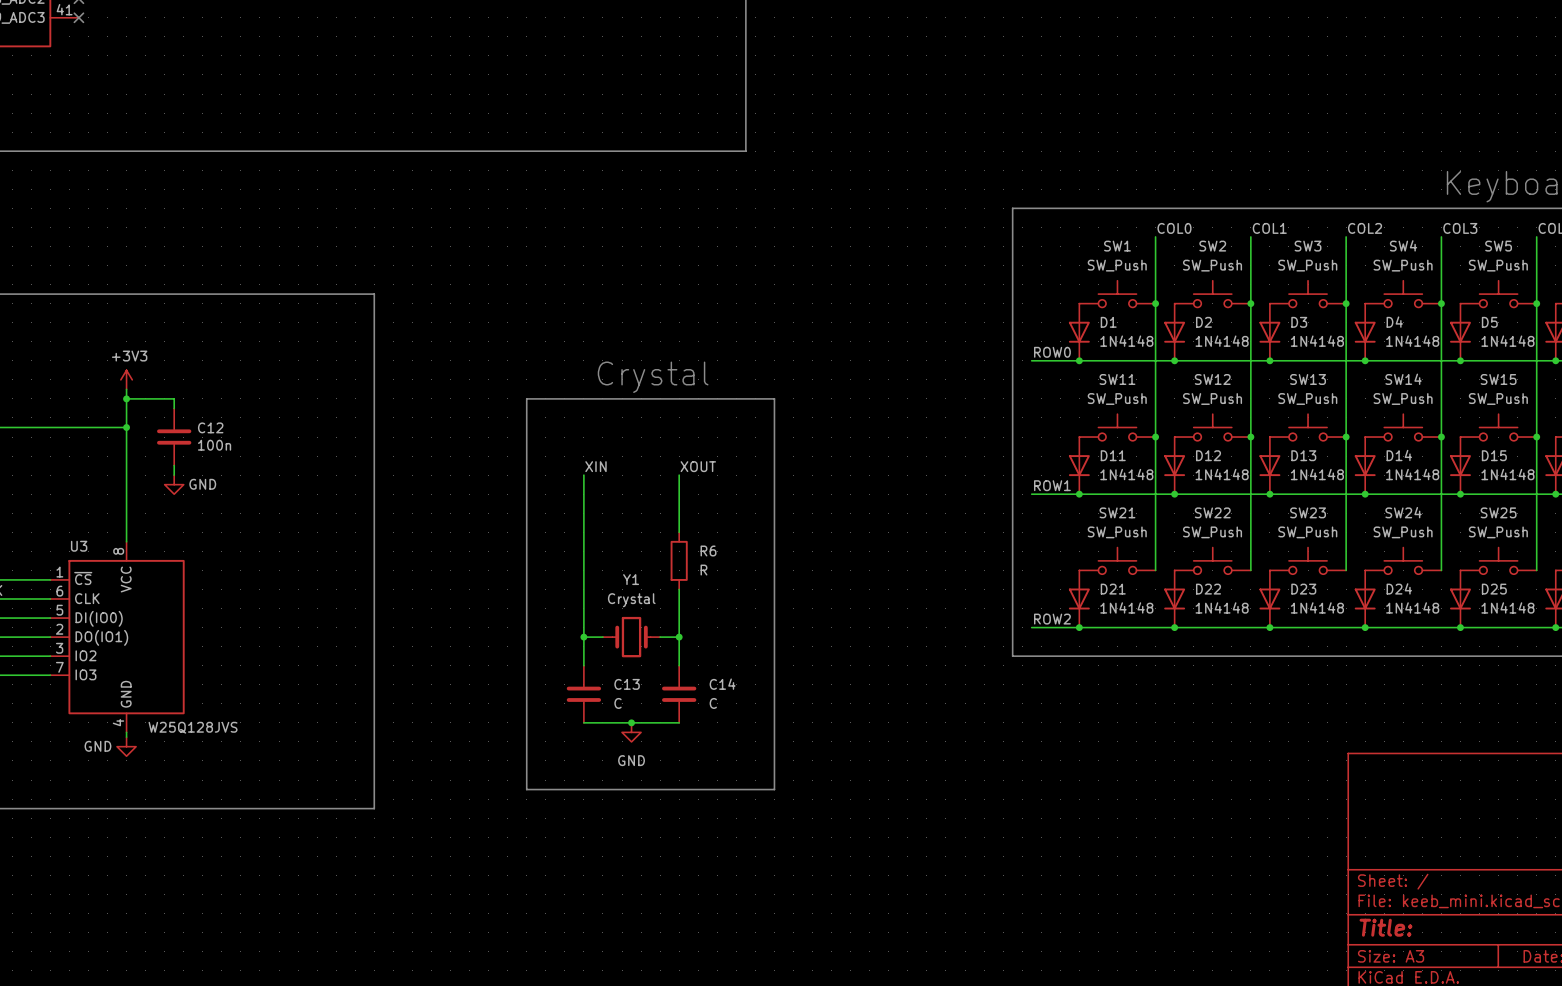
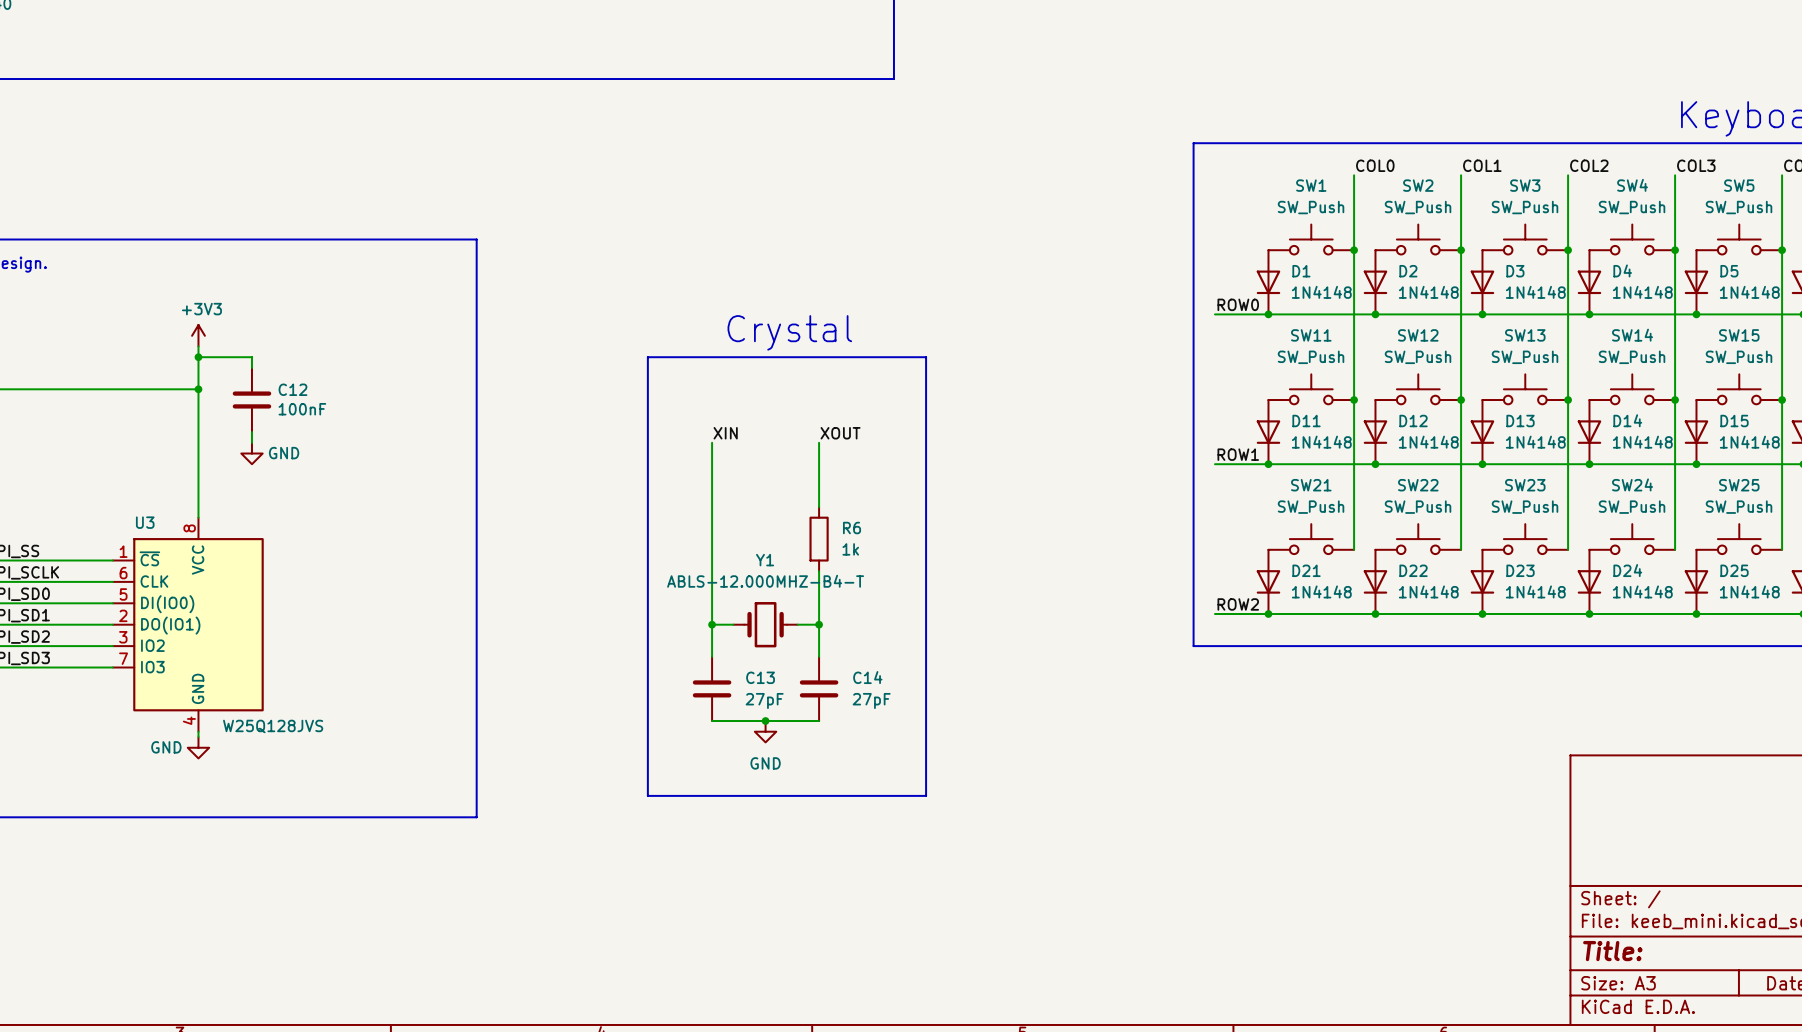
C12 value: 100n (214, 445) -> 100nF (302, 409)
R6 value: R (703, 570) -> 1k (850, 549)
Y1 value: Crystal (631, 600) -> ABLS-12.000MHZ-B4-T (765, 581)
C13 value: C (618, 703) -> 27pF (764, 700)
C14 value: C (713, 703) -> 27pF (871, 700)

